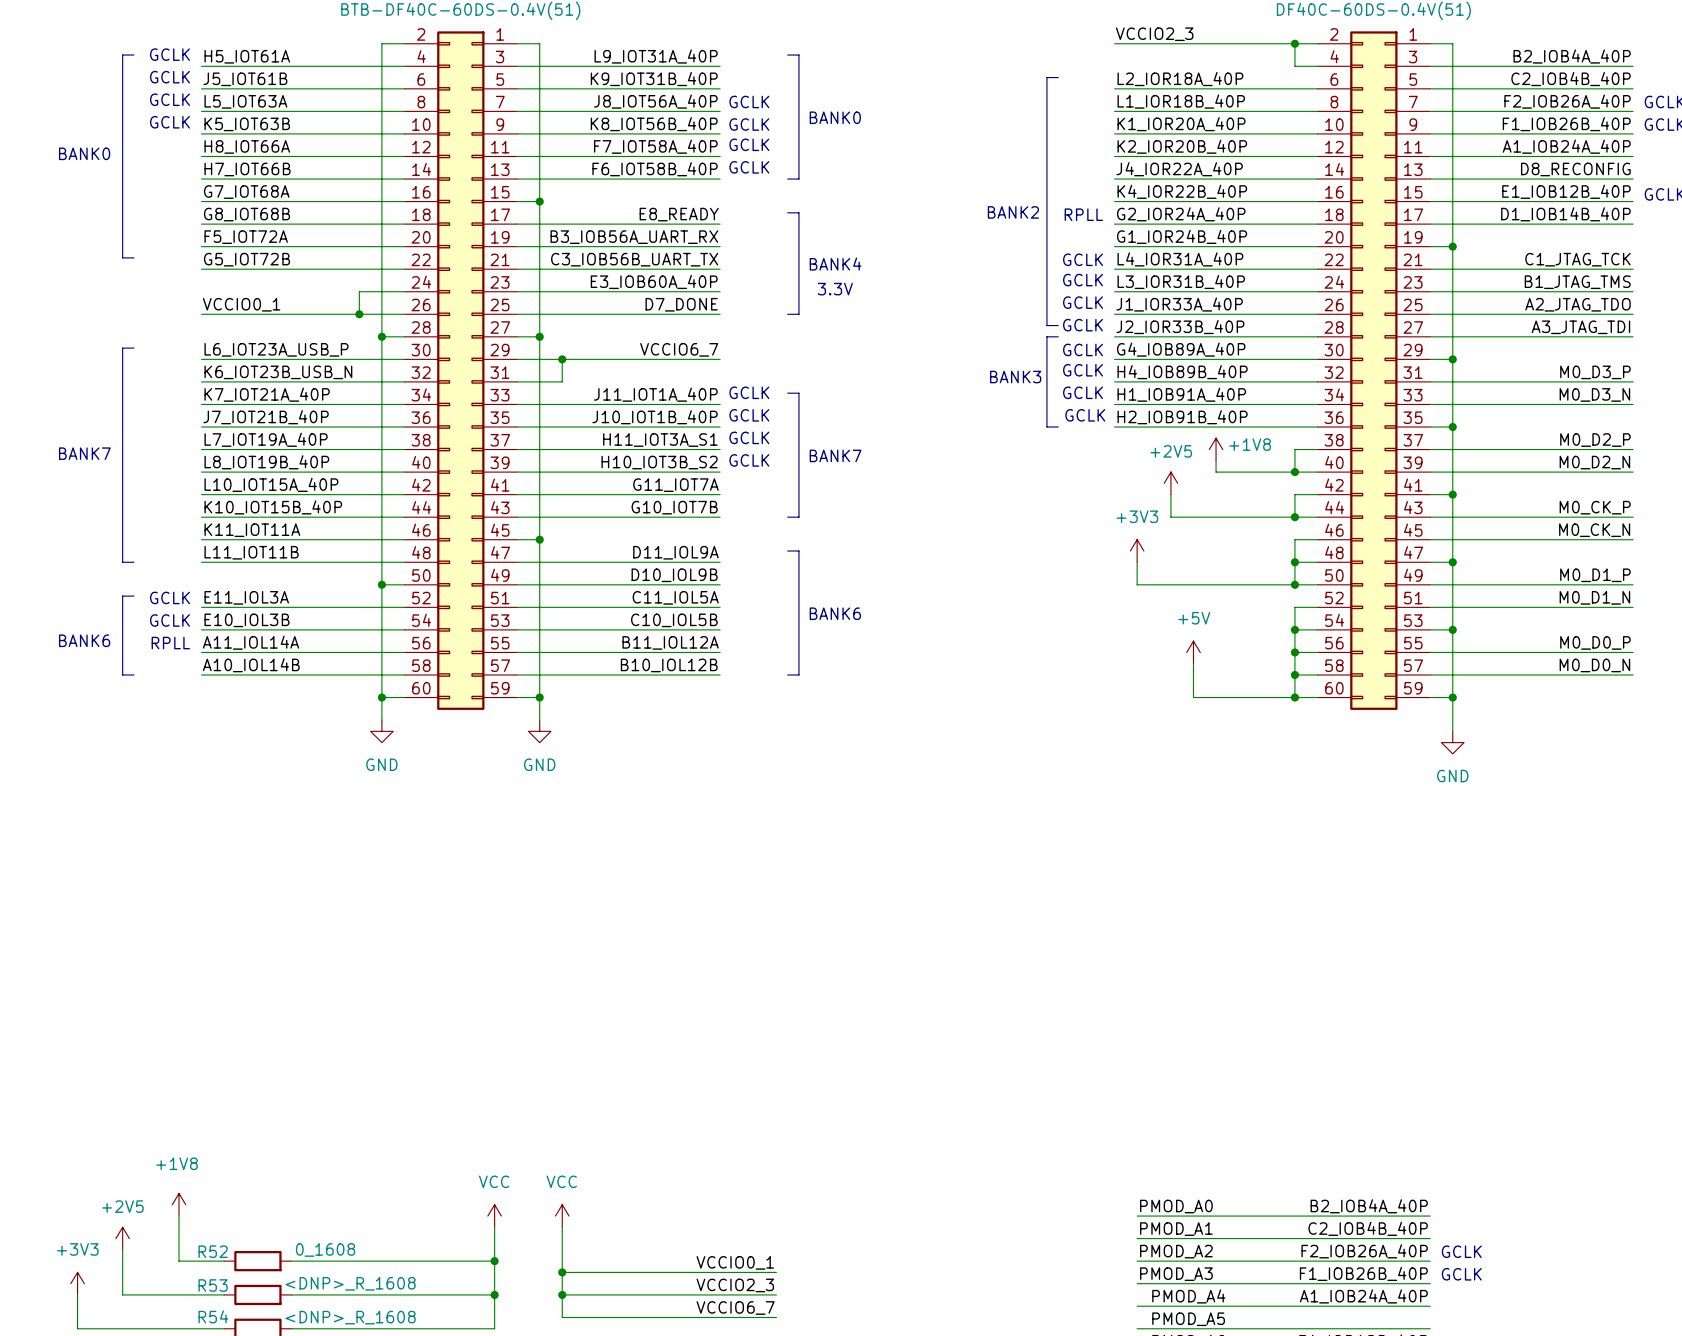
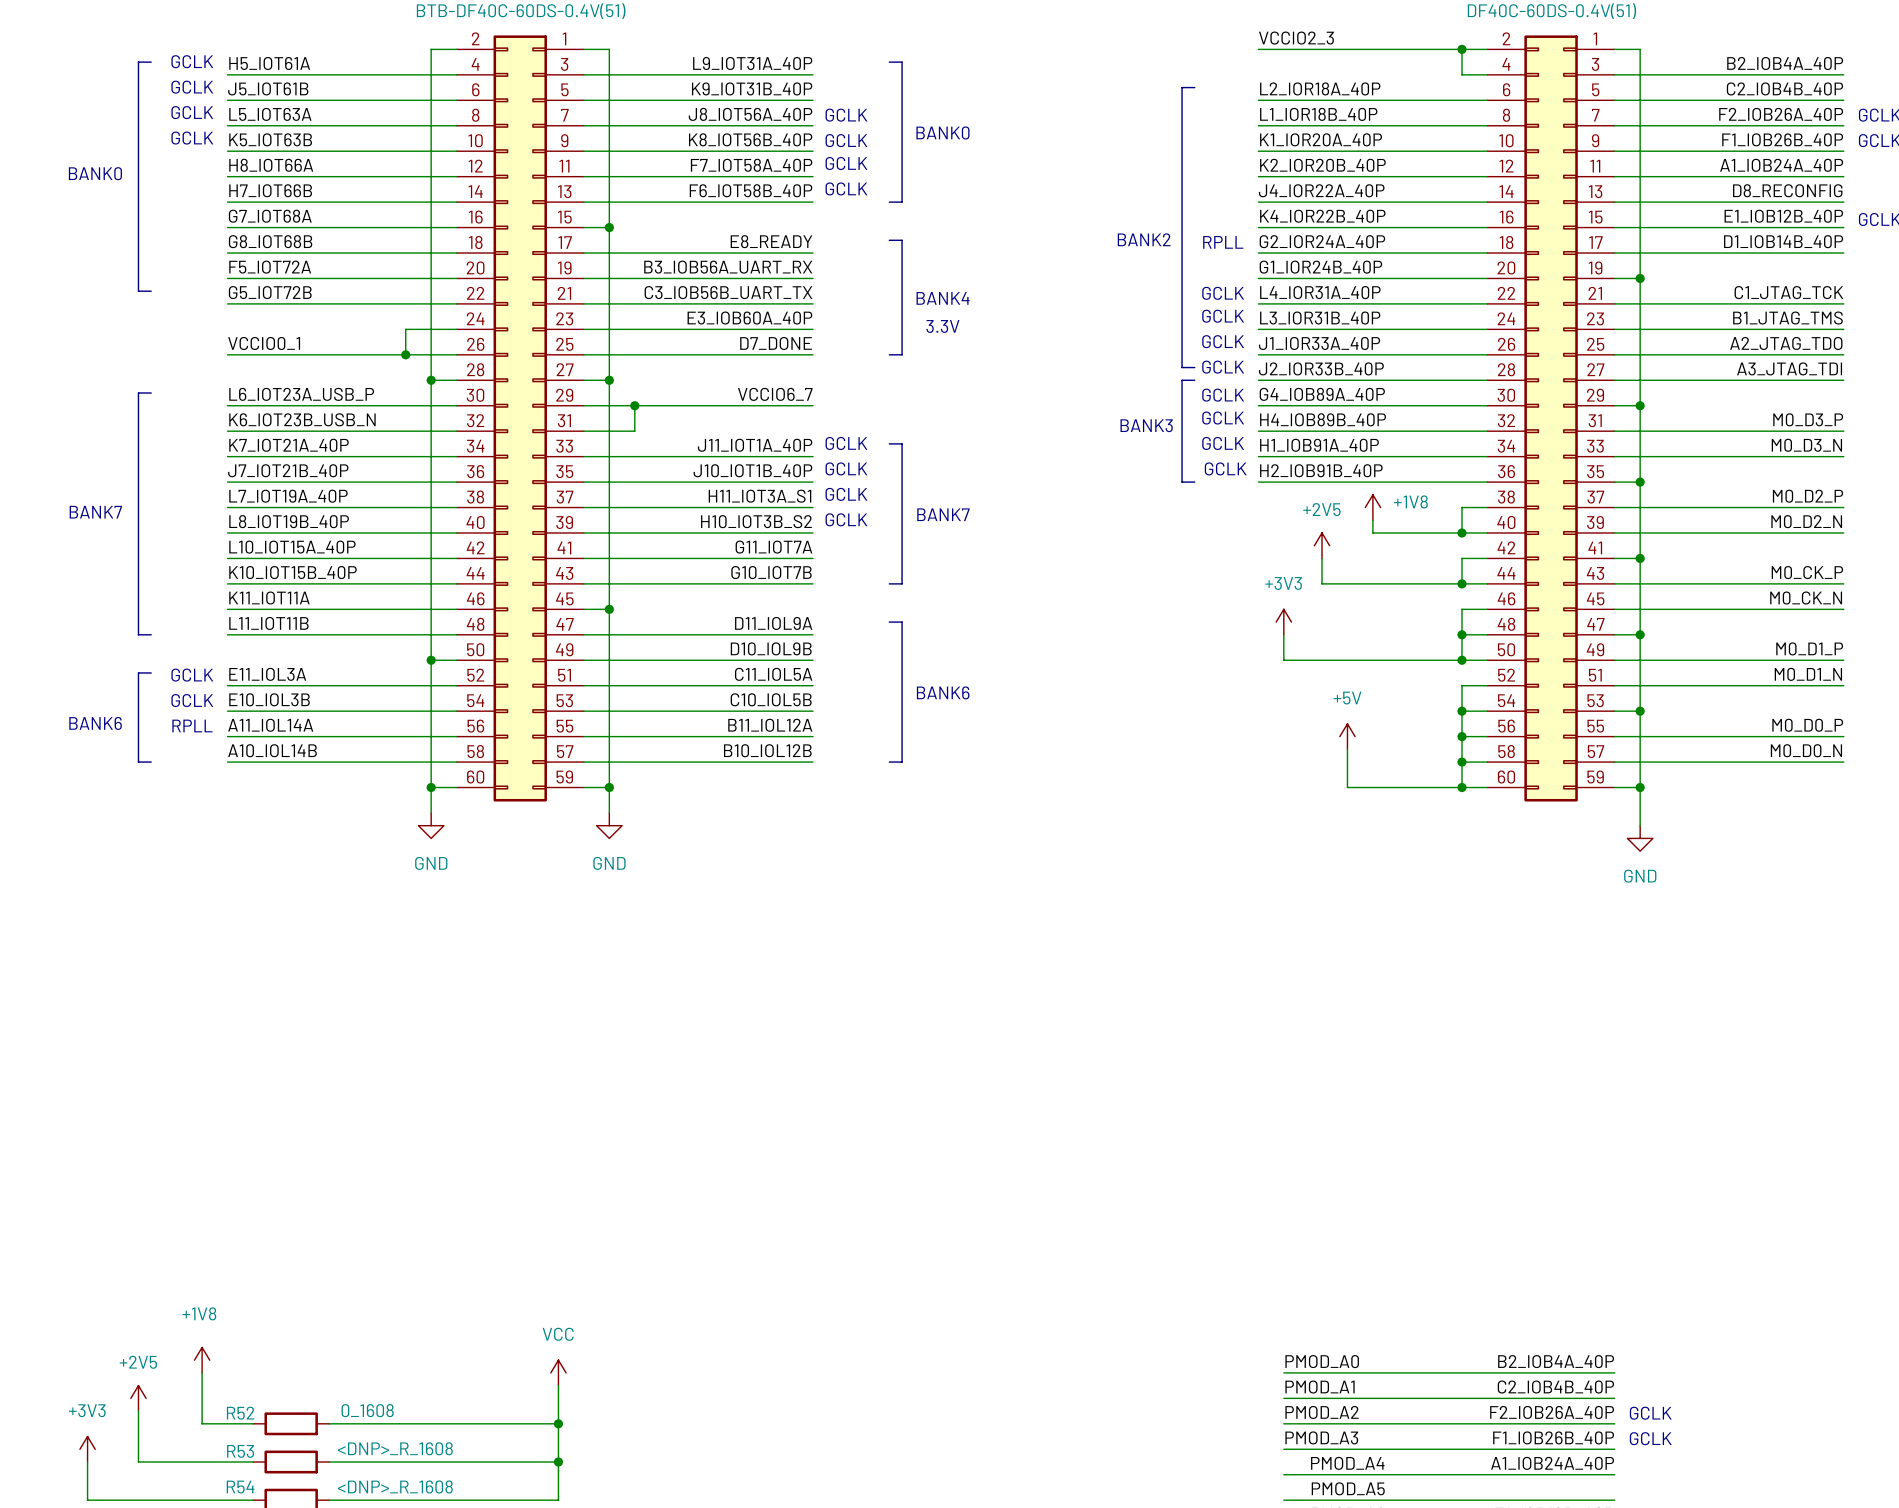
power symbol: VCC (562, 1216) -> none
wire: (562, 1227) (562, 1317) (776, 1317) -> none
label: VCCIO0_1 (735, 1262) -> none
wire: (562, 1272) (776, 1272) -> none
junction: (562, 1272) -> none
label: VCCIO2_3 (735, 1285) -> none
wire: (562, 1294) (776, 1294) -> none
junction: (562, 1294) -> none
label: VCCIO6_7 (735, 1307) -> none

